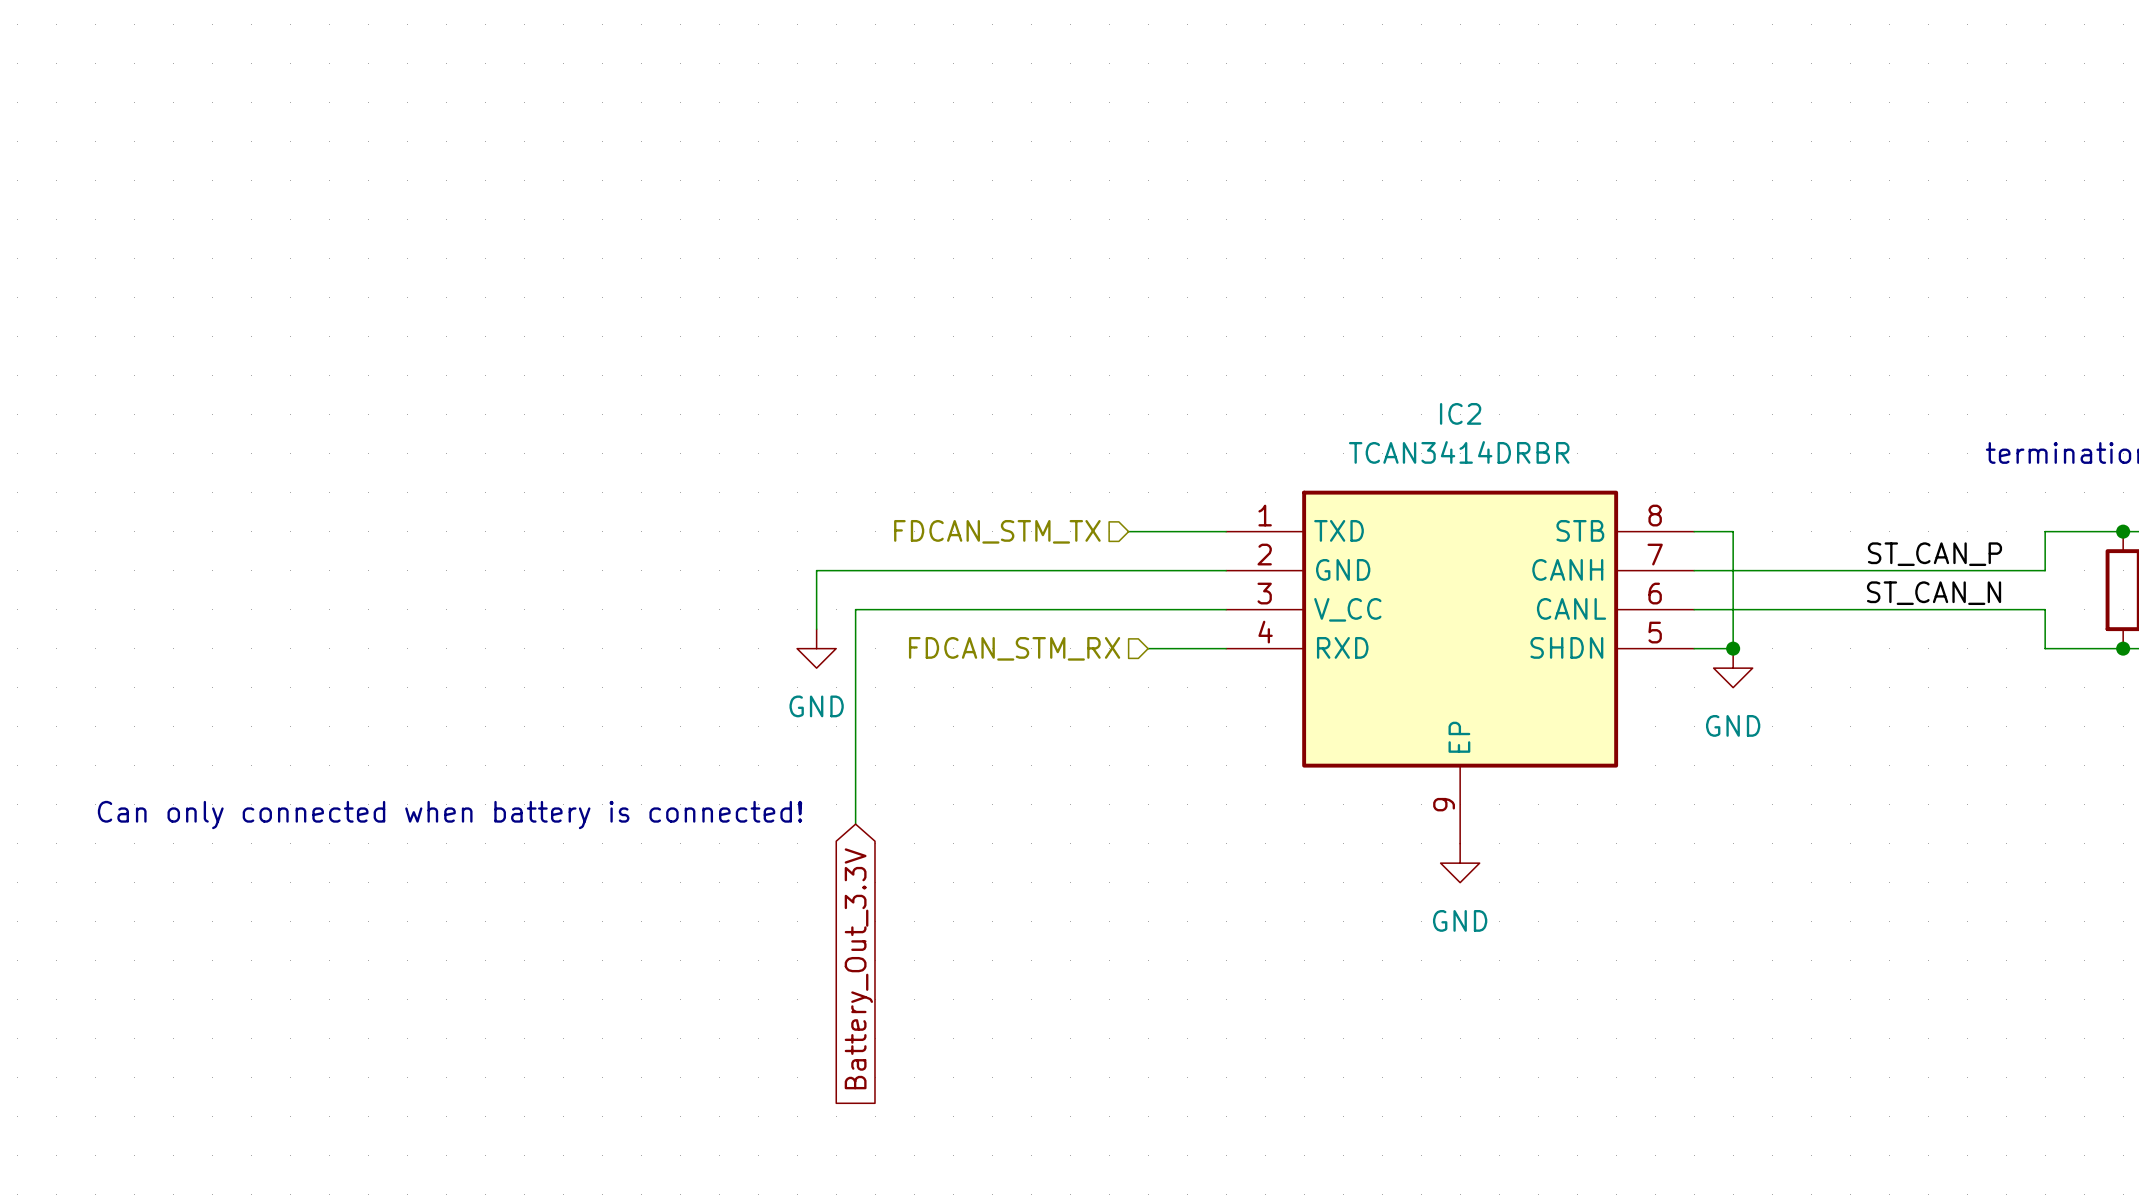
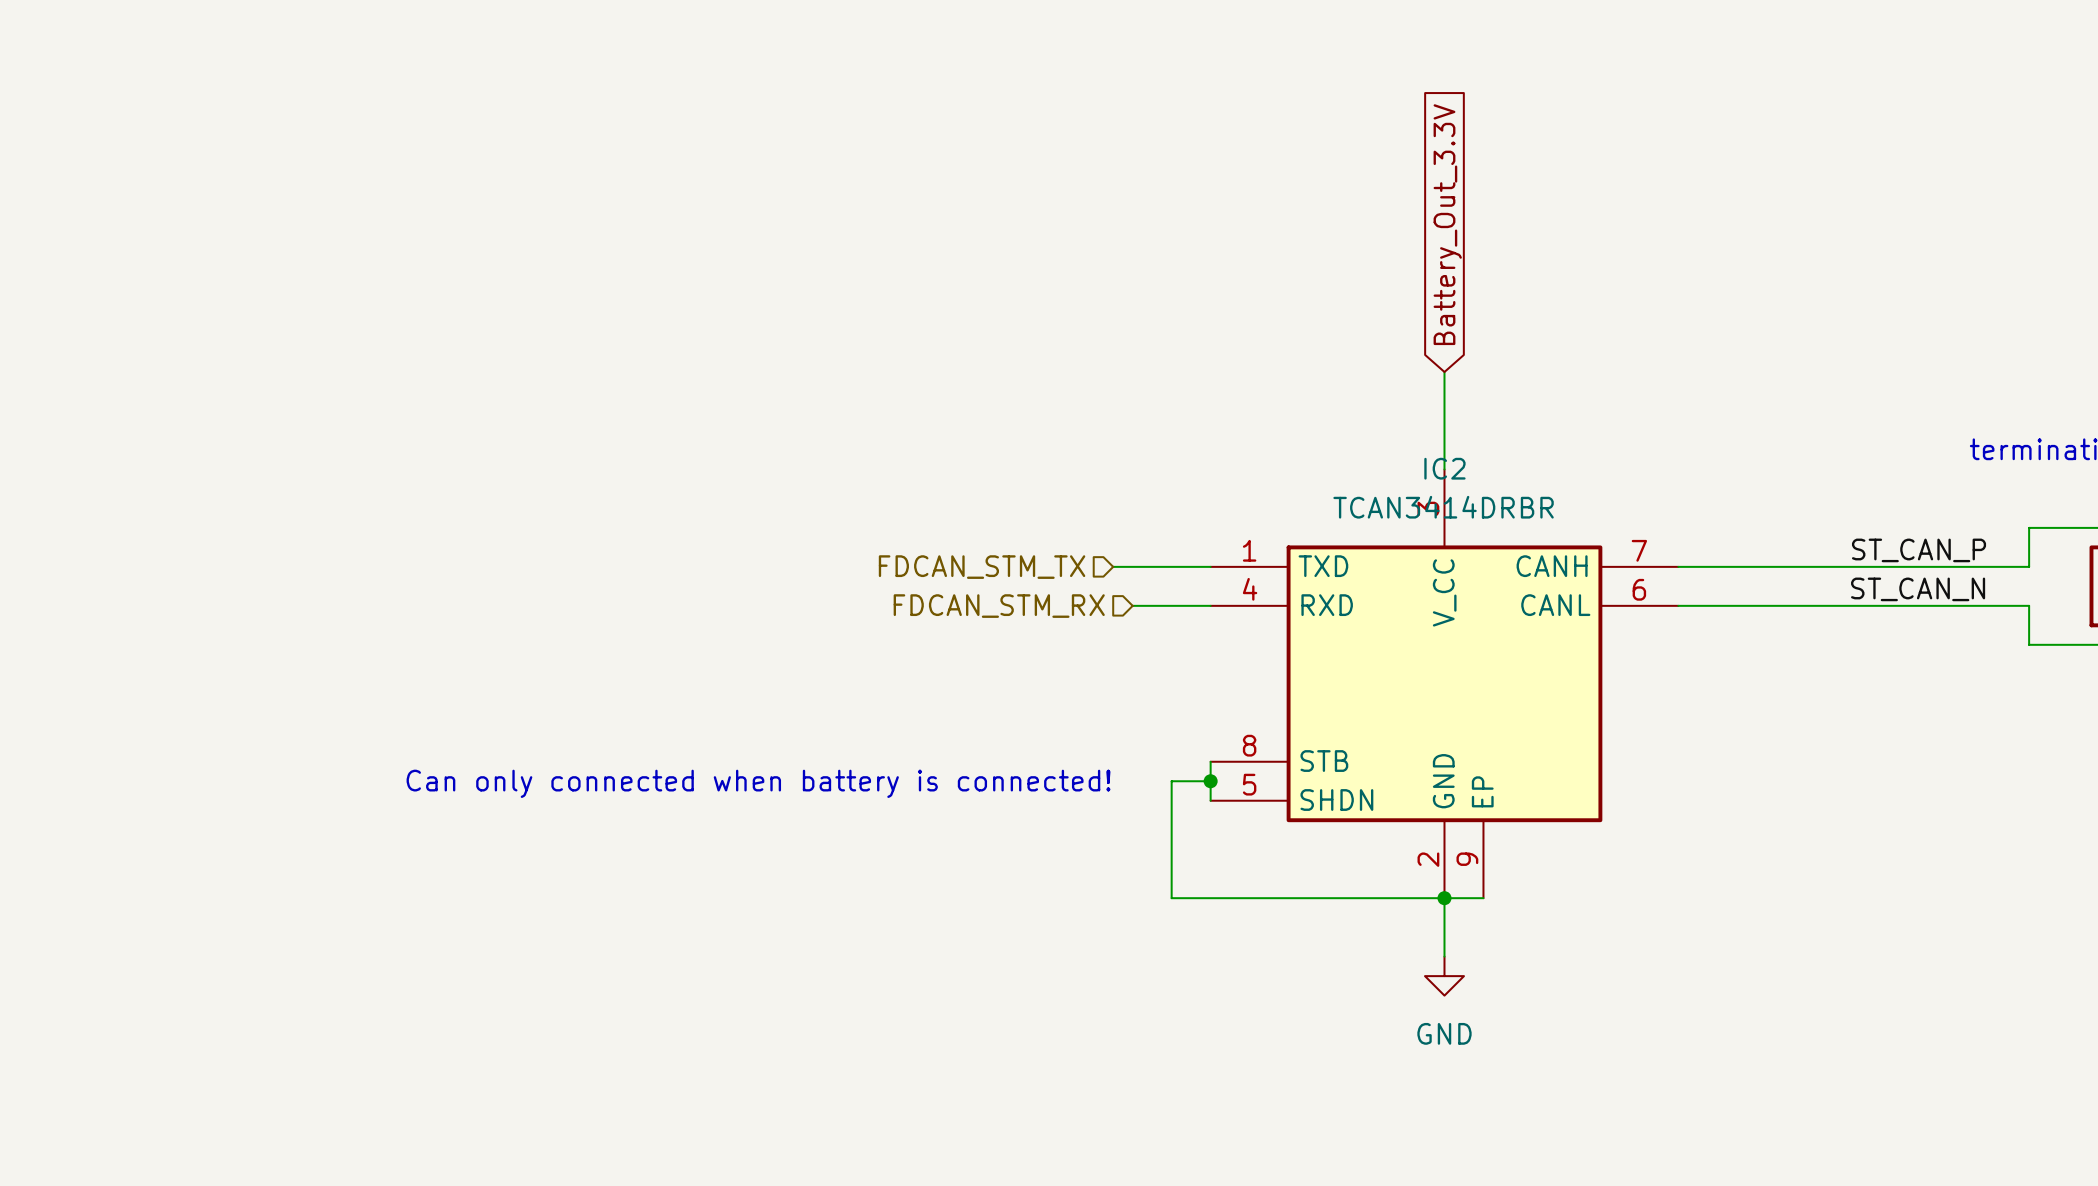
global label: none -> Battery_Out_3.3V (1447, 224)
wire: none -> (1444, 372) (1444, 469)
IC2 name position: IC2 (1460, 413) -> IC2 (1444, 468)
IC2 value position: TCAN3414DRBR (1459, 452) -> TCAN3414DRBR (1443, 507)
IC2 symbol: [1226, 490, 1695, 844] -> [1210, 469, 1679, 899]
hierarchical label position: FDCAN_STM_TX (997, 531) -> FDCAN_STM_TX (982, 567)
wire: (1128, 531) (1226, 531) -> none
wire: (1694, 531) (1733, 531) (1733, 648) (1694, 648) -> none
wire: (1128, 570) (816, 570) (816, 629) -> none
wire: (1148, 609) (855, 609) (855, 824) -> none
power symbol: GND (816, 648) -> none
hierarchical label position: FDCAN_STM_RX (1014, 648) -> FDCAN_STM_RX (999, 606)
wire: (1148, 648) (1226, 648) -> none
junction: (1733, 648) -> none
power symbol: GND (1733, 668) -> none
wire: none -> (1210, 761) (1210, 800)
wire: none -> (1210, 781) (1171, 781) (1171, 898) (1483, 898)
junction: none -> (1210, 781)
text position: Can only connected when battery is connected! (450, 815) -> Can only connected when battery is connected! (758, 783)
power symbol position: GND (1460, 863) -> GND (1444, 976)
wire: none -> (1444, 898) (1444, 956)
junction: none -> (1444, 898)
global label: Battery_Out_3.3V (858, 968) -> none

